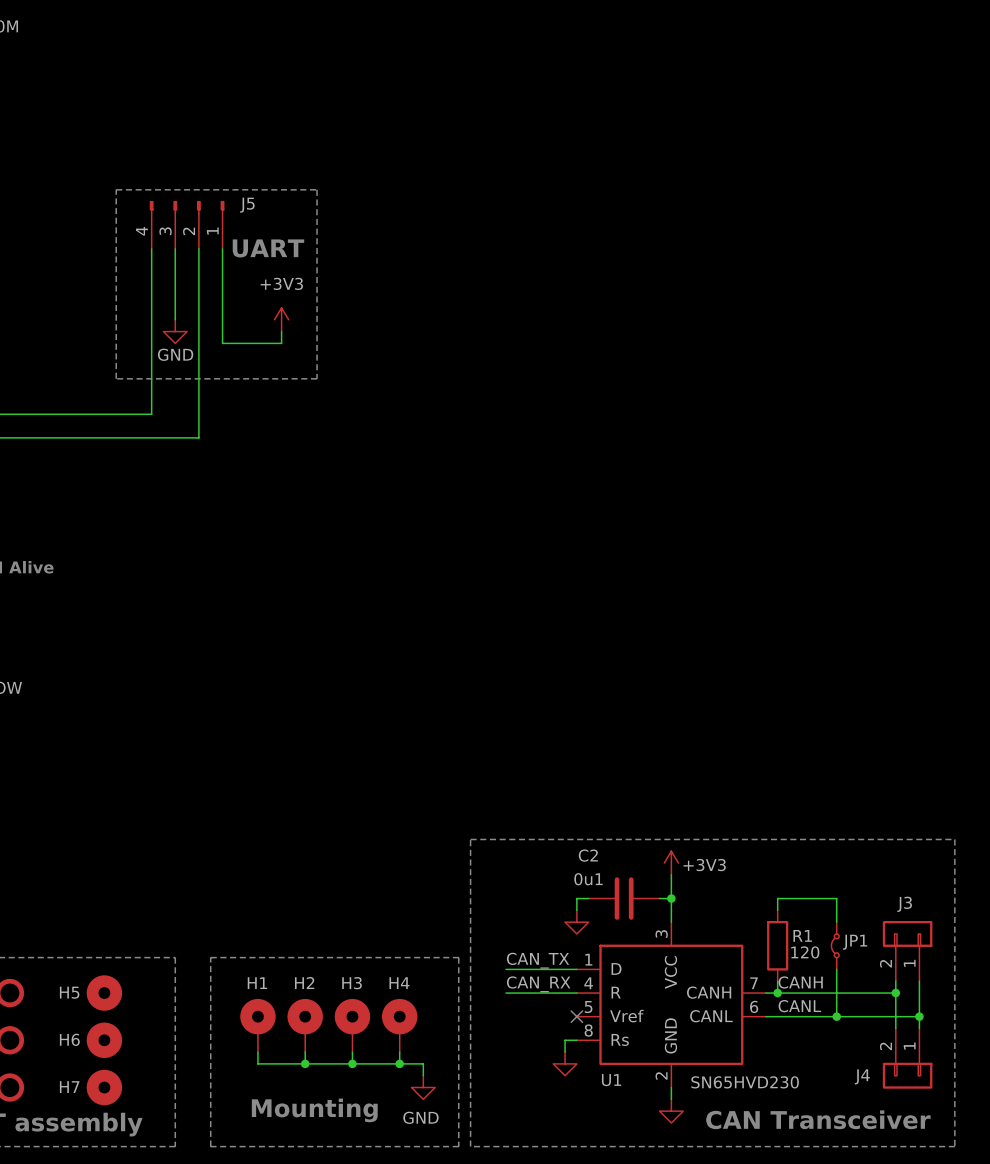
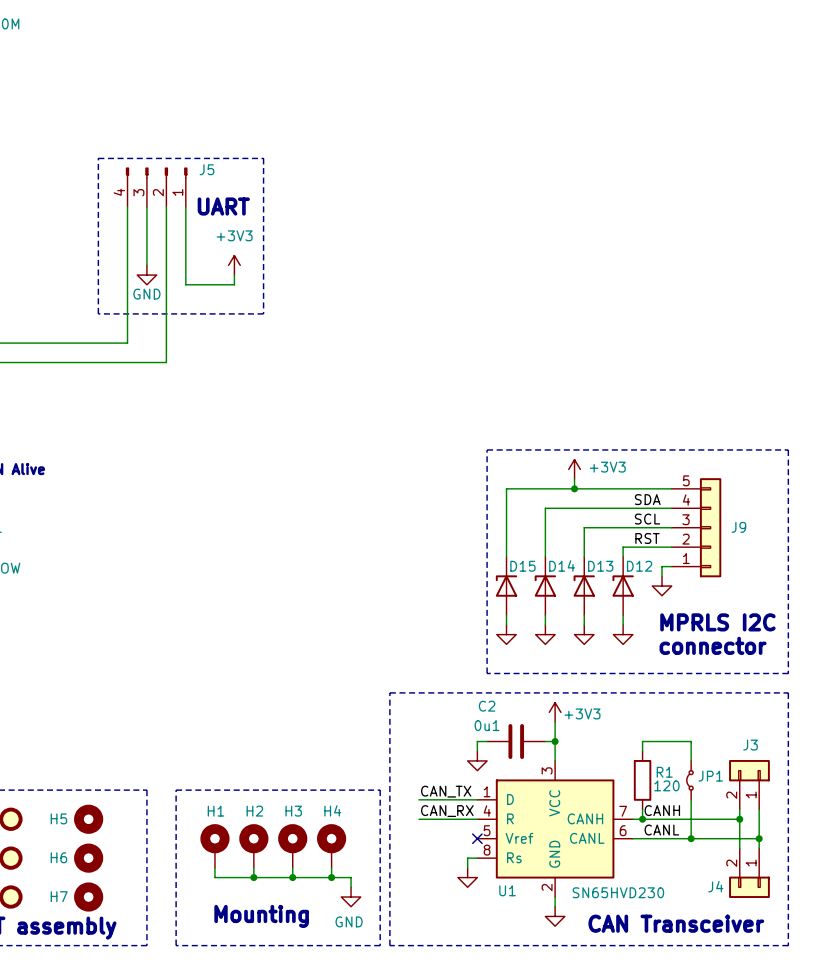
line: none -> (487, 449) (788, 449) (788, 673) (487, 673) (487, 449)
power symbol: none -> +3V3 (574, 469)
wire: none -> (574, 479) (574, 488)
junction: none -> (574, 488)
wire: none -> (671, 488) (506, 488) (506, 556)
label: none -> SDA (647, 499)
wire: none -> (671, 508) (545, 508) (545, 556)
label: none -> SCL (647, 519)
wire: none -> (671, 527) (584, 527) (584, 556)
J9: none -> (696, 527)
label: none -> RST (647, 538)
wire: none -> (671, 547) (623, 547) (623, 556)
wire: none -> (671, 566) (662, 566) (662, 576)
D15: none -> (506, 586)
D14: none -> (545, 586)
D13: none -> (584, 586)
D12: none -> (623, 586)
power symbol: none -> (662, 586)
wire: none -> (506, 615) (506, 624)
wire: none -> (545, 615) (545, 624)
wire: none -> (584, 615) (584, 624)
wire: none -> (623, 615) (623, 624)
text: none -> MPRLS I2C (717, 622)
power symbol: none -> (506, 634)
power symbol: none -> (545, 634)
power symbol: none -> (584, 634)
power symbol: none -> (623, 634)
text: none -> connector (713, 645)

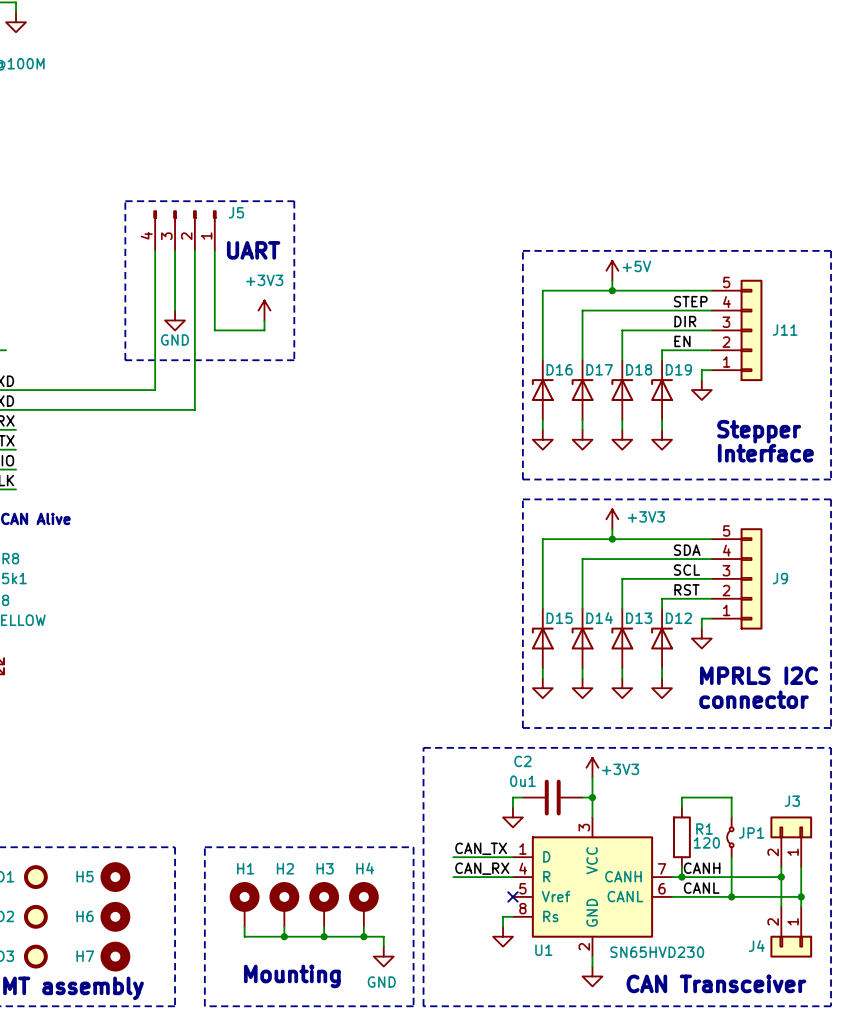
line: none -> (522, 250) (831, 250) (831, 479) (522, 479) (522, 250)
power symbol: none -> +5V (612, 270)
wire: none -> (612, 280) (612, 290)
junction: none -> (612, 290)
wire: none -> (711, 290) (542, 290) (542, 360)
label: none -> STEP (690, 301)
wire: none -> (711, 310) (582, 310) (582, 360)
label: none -> DIR (685, 321)
wire: none -> (711, 330) (622, 330) (622, 360)
J11: none -> (737, 330)
label: none -> EN (682, 341)
wire: none -> (711, 350) (662, 350) (662, 360)
wire: none -> (711, 370) (701, 370) (701, 380)
D16: none -> (542, 390)
D17: none -> (582, 390)
D18: none -> (622, 390)
D19: none -> (662, 390)
power symbol: none -> (701, 390)
wire: none -> (542, 419) (542, 429)
wire: none -> (582, 419) (582, 429)
wire: none -> (622, 419) (622, 429)
wire: none -> (662, 419) (662, 429)
text: none -> Stepper (759, 431)
power symbol: none -> (542, 439)
power symbol: none -> (582, 439)
power symbol: none -> (622, 439)
power symbol: none -> (662, 439)
text: none -> Interface (765, 453)

